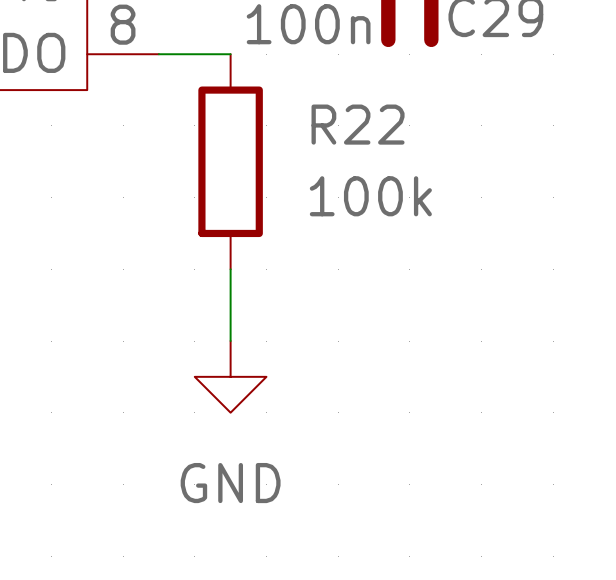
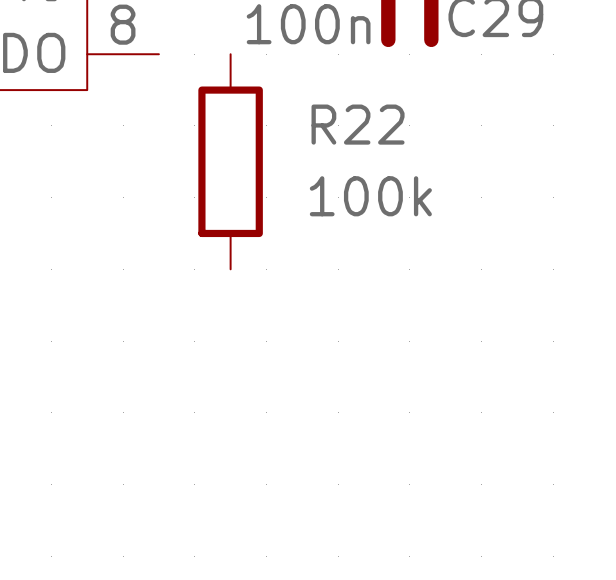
wire: (158, 54) (230, 54) -> none
wire: (230, 269) (230, 341) -> none
power symbol: GND (230, 376) -> none

